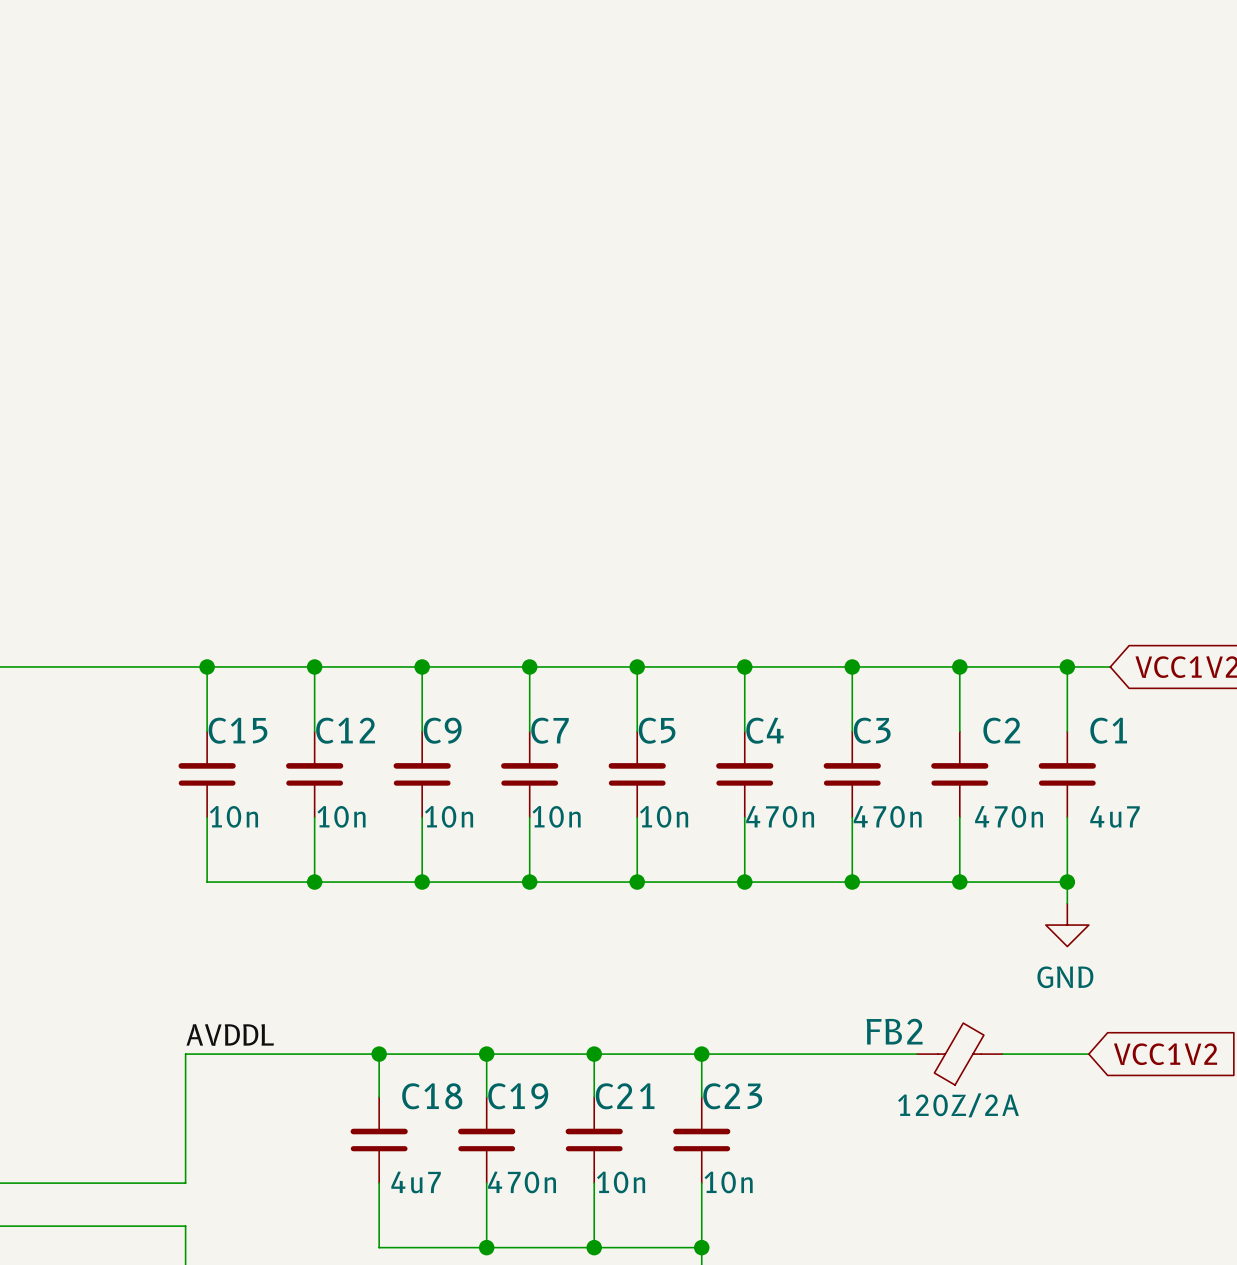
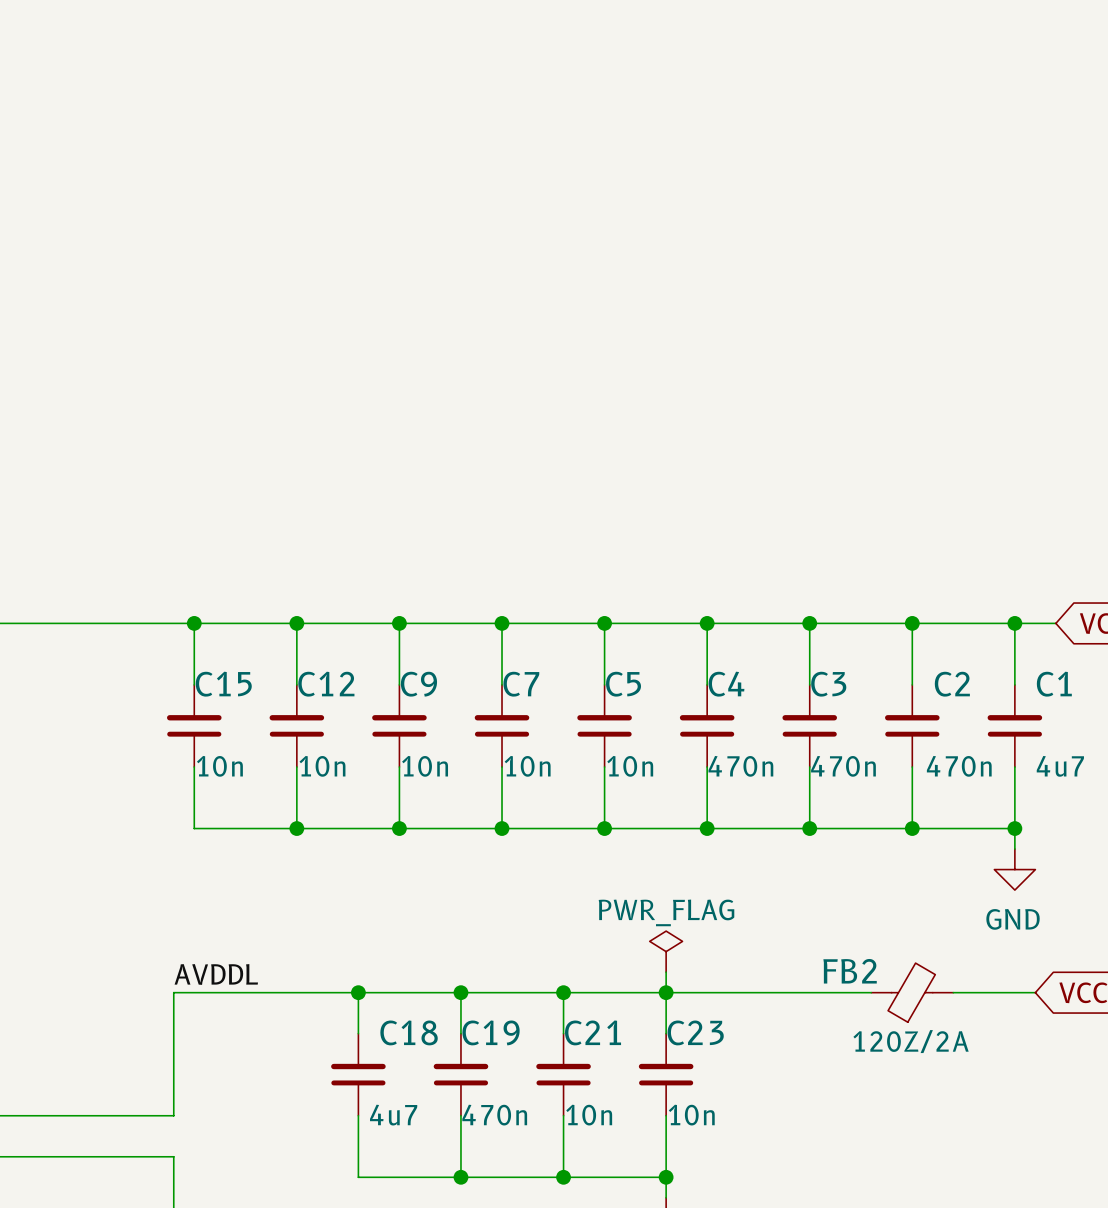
power symbol: none -> PWR_FLAG (666, 951)
wire: none -> (666, 972) (666, 992)

